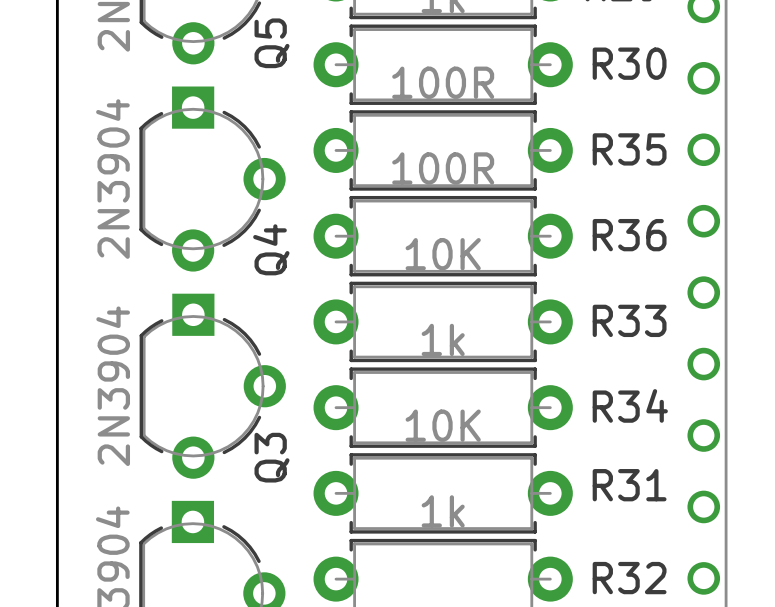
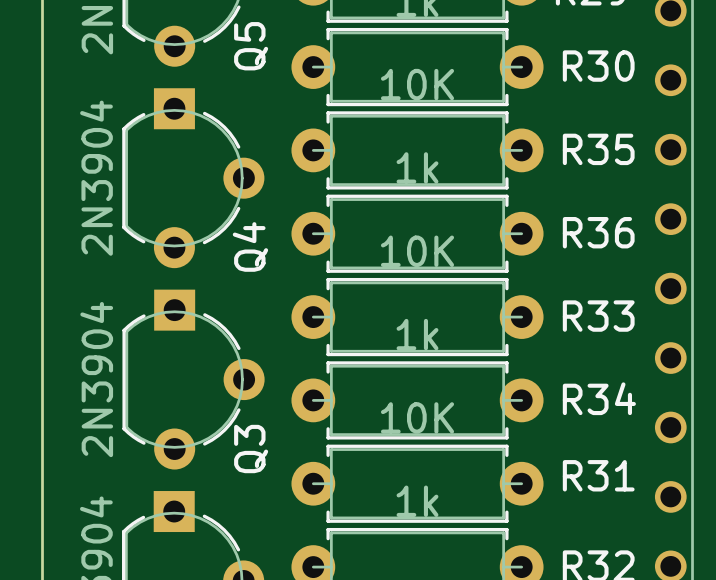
R35 value: 100R (443, 82) -> 10K (417, 84)
R36 value: 100R (443, 168) -> 1k (417, 167)

